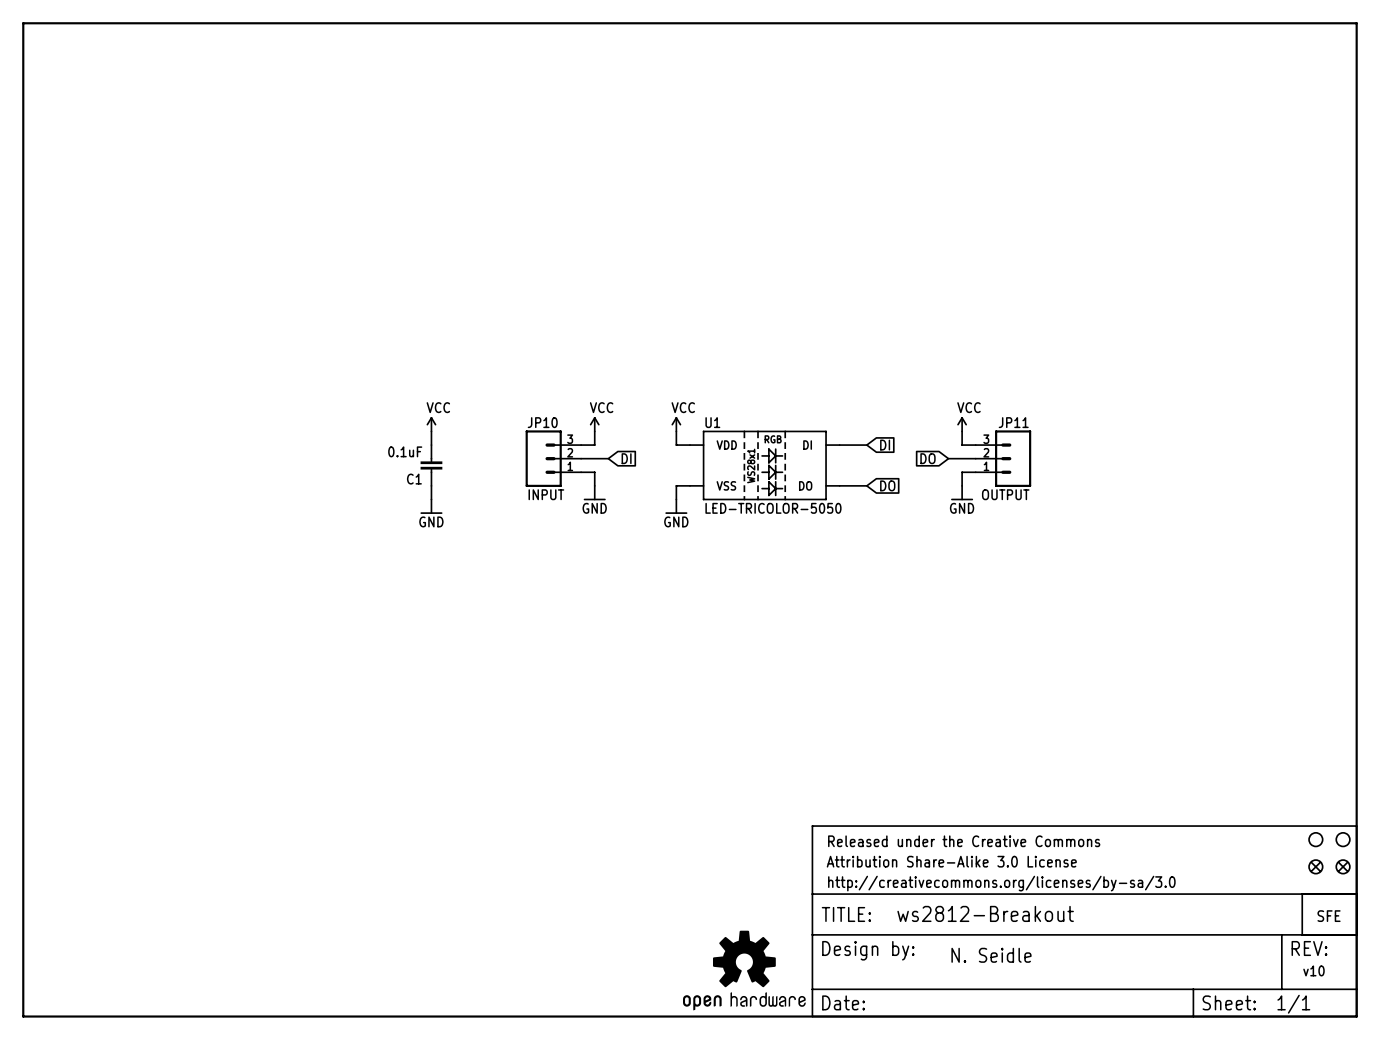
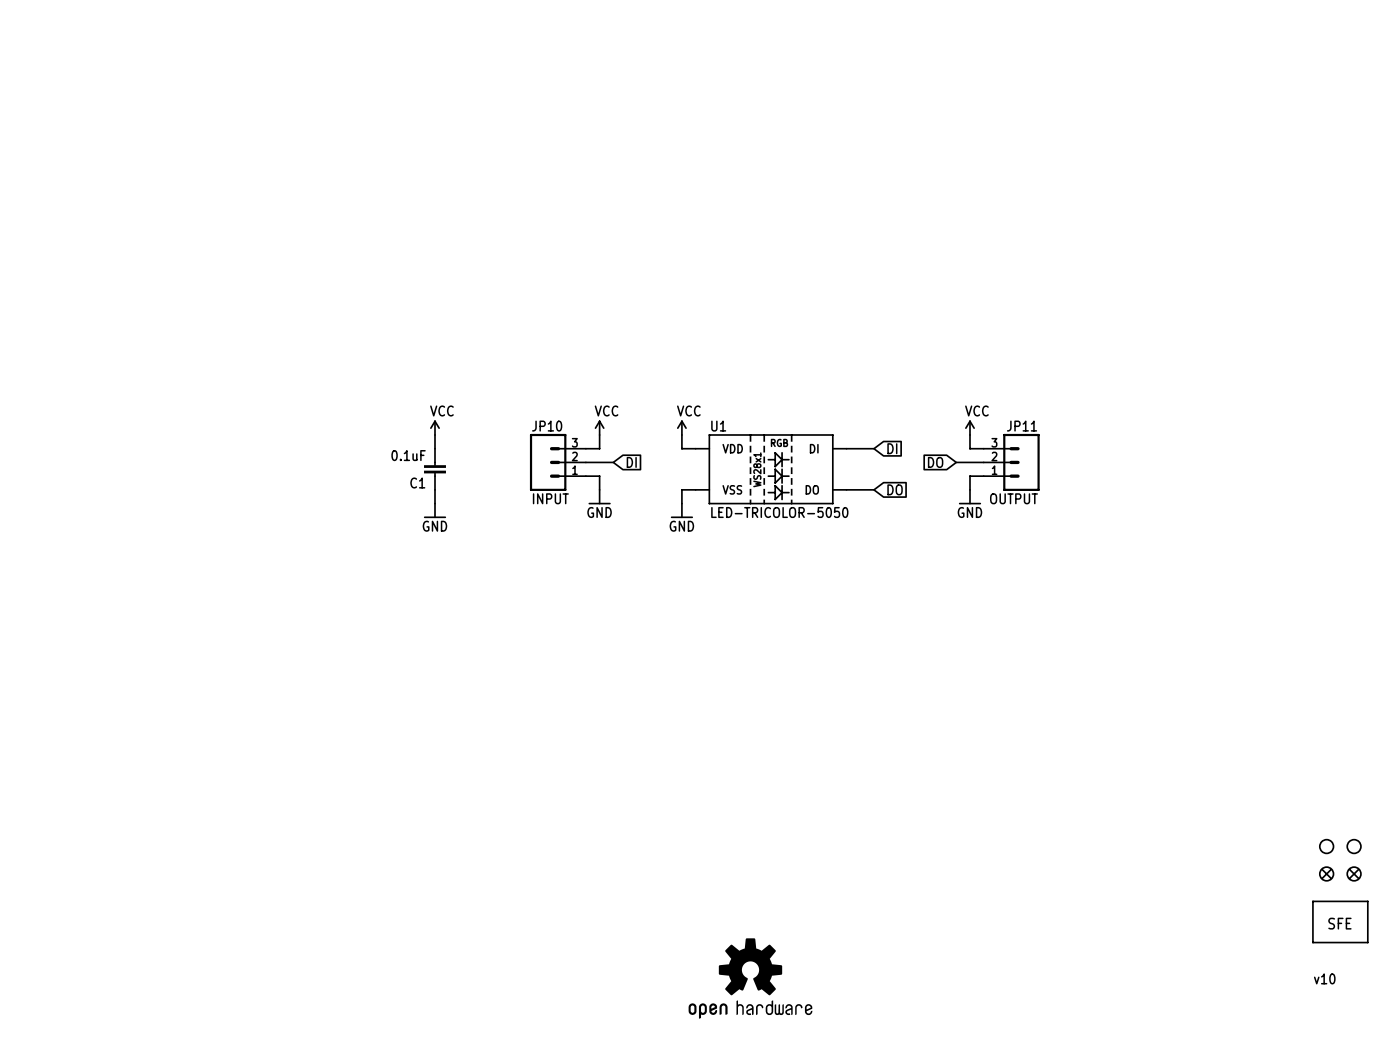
part: (689, 519) -> none
part: (1084, 921) -> none
text: N. Seidle (991, 955) -> none

